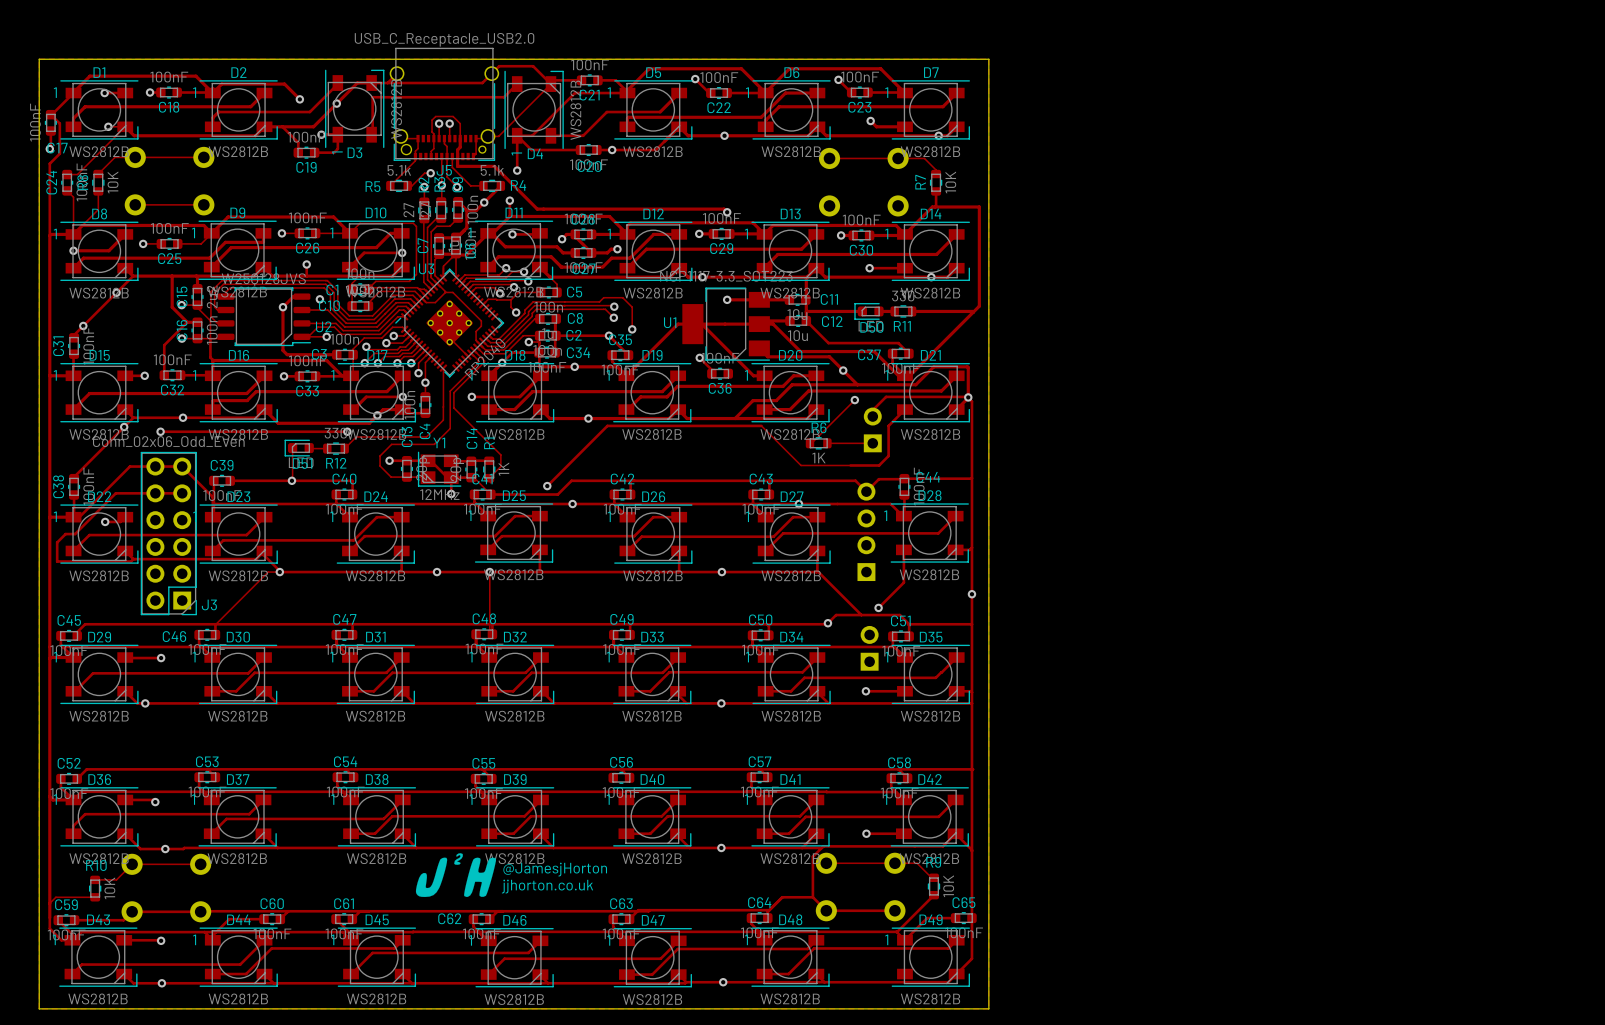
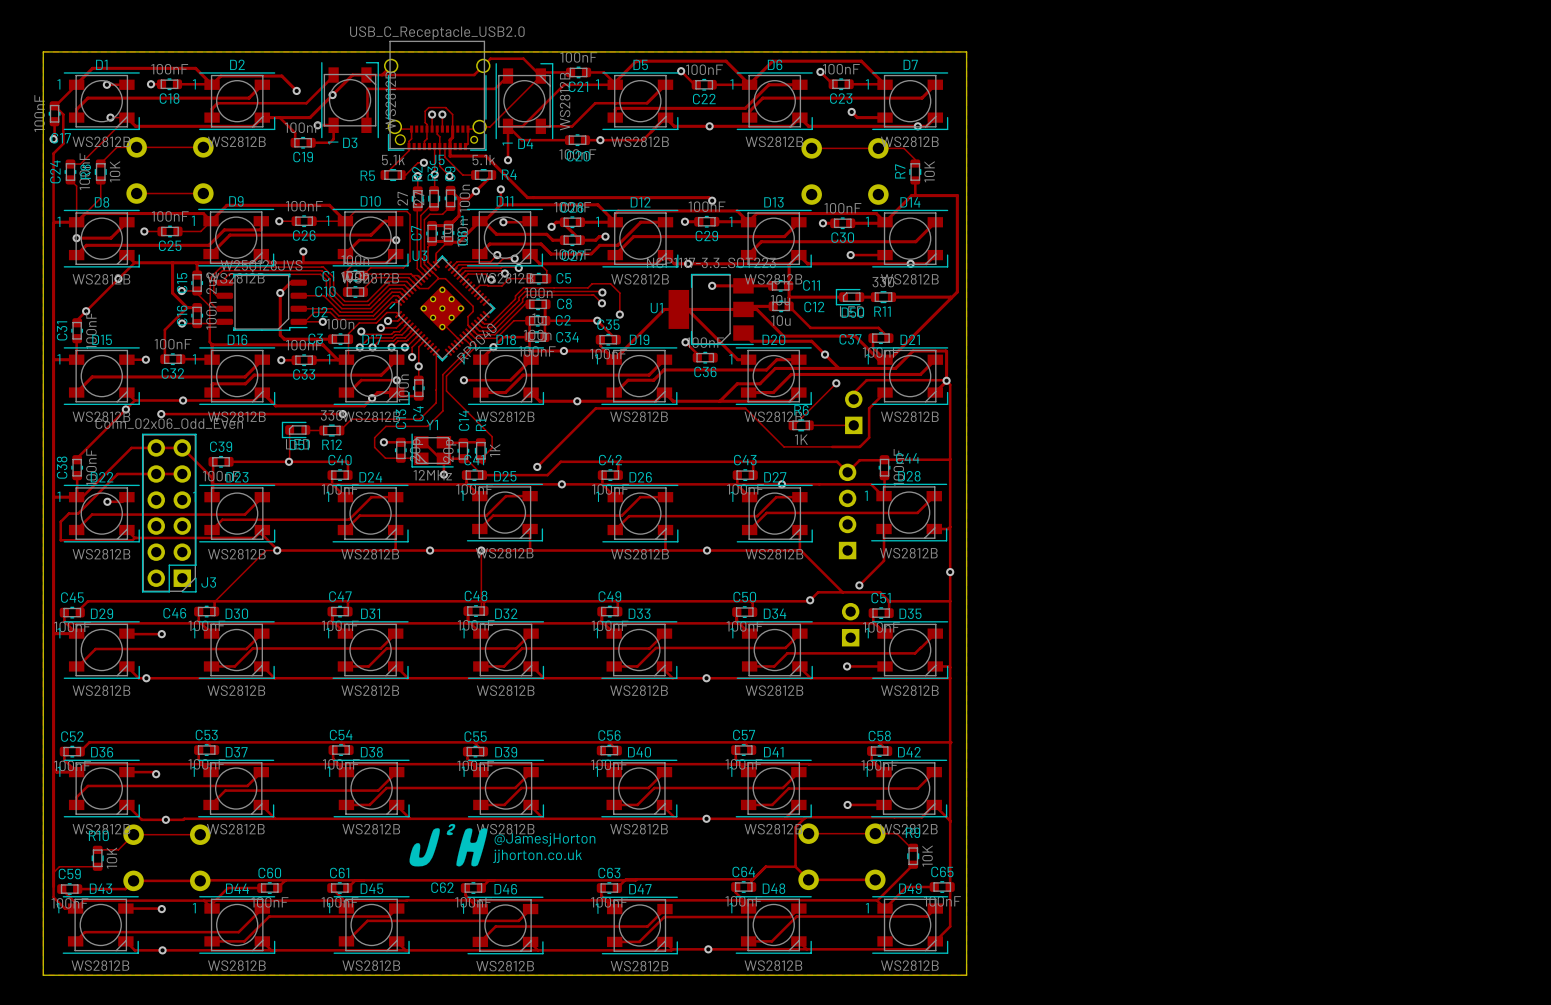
track: (456, 253) (456, 277) -> none
via: (319, 299) -> none
track: (511, 299) (511, 307) (516, 312) -> none
via: (516, 312) -> none
track: (528, 342) (539, 343) -> none
via: (528, 342) -> none

